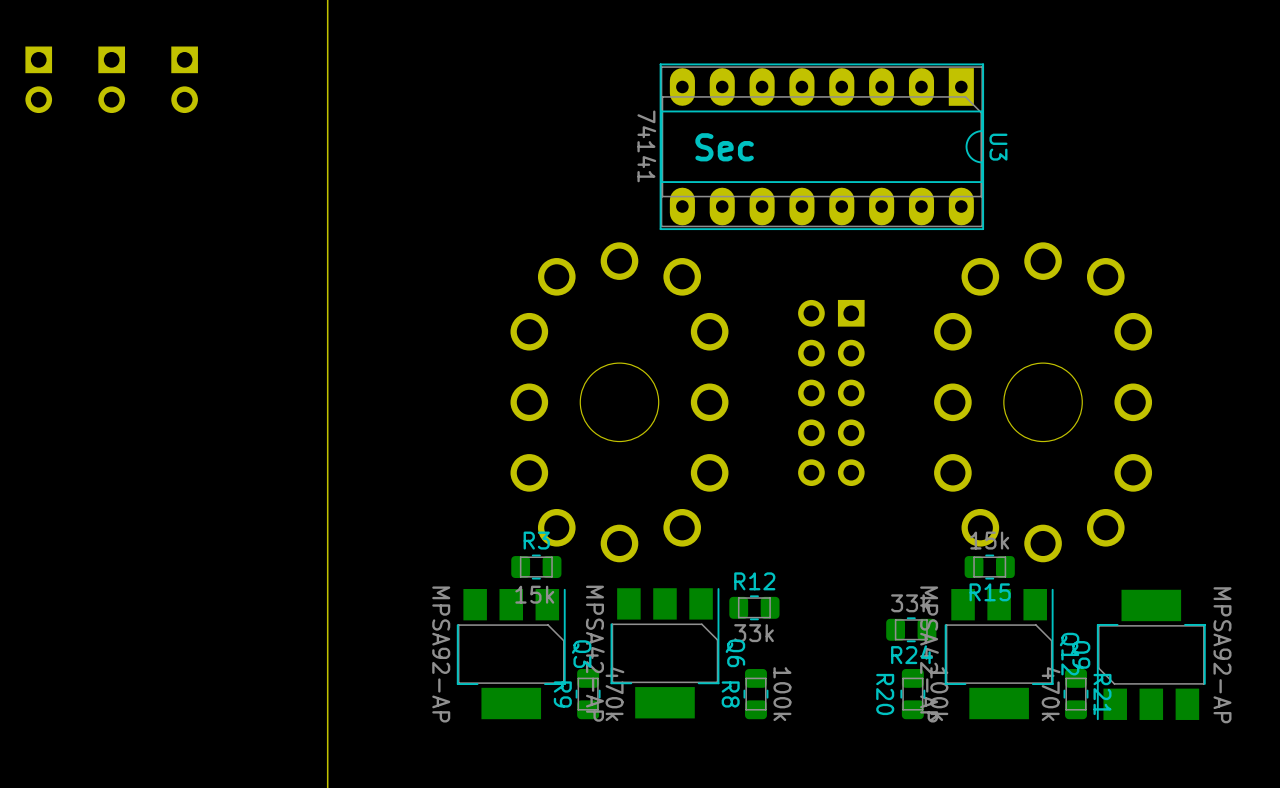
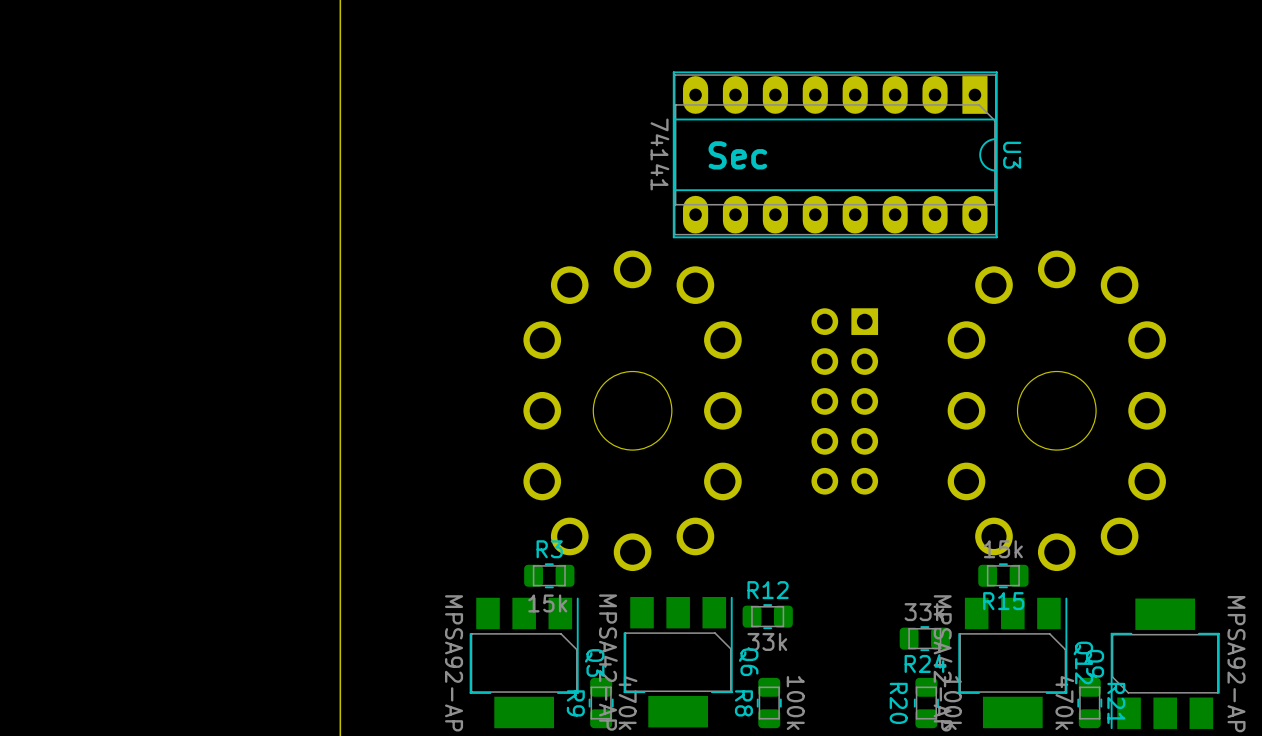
part: (38, 79) -> none
part: (111, 79) -> none
part: (184, 79) -> none

